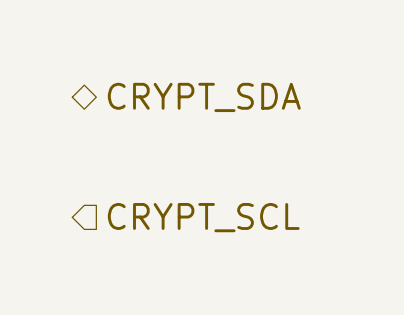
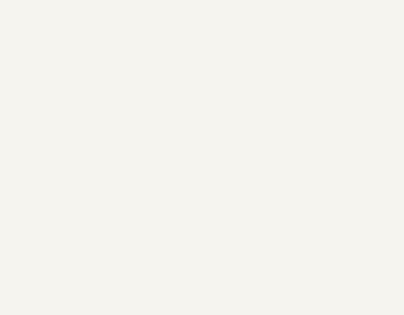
hierarchical label: CRYPT_SDA (204, 97) -> none
hierarchical label: CRYPT_SCL (203, 217) -> none

